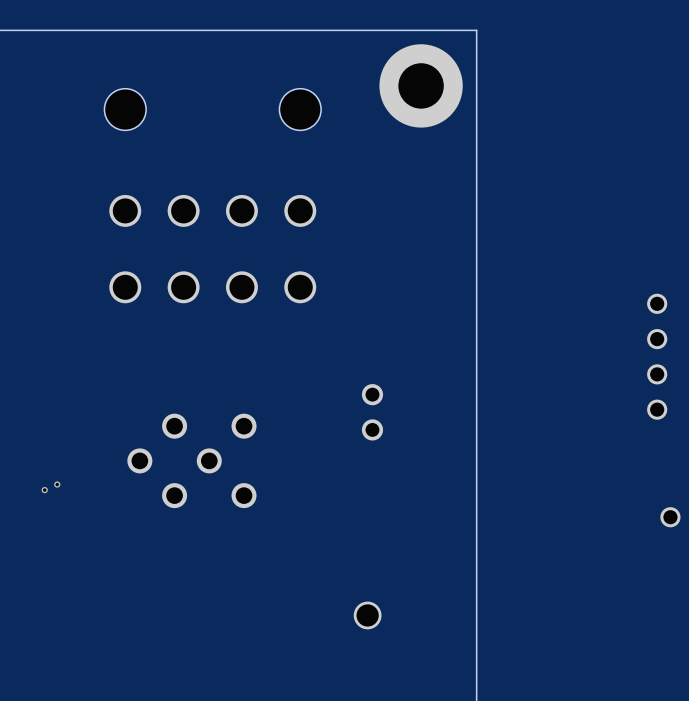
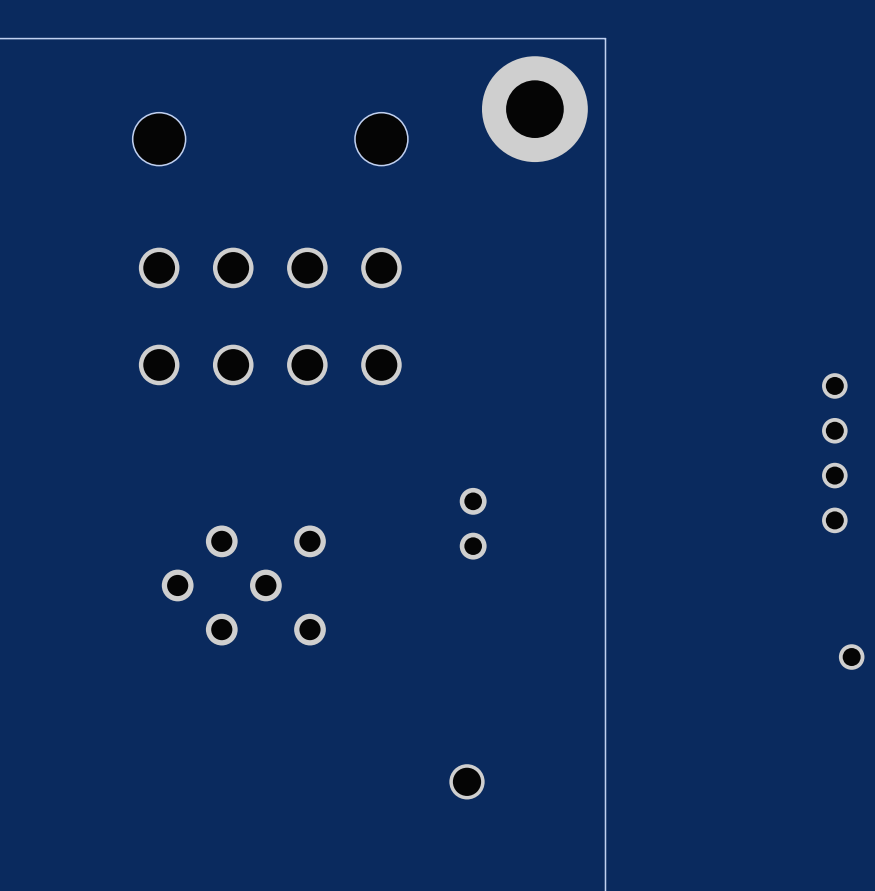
via: (57, 484) -> none
via: (44, 490) -> none

